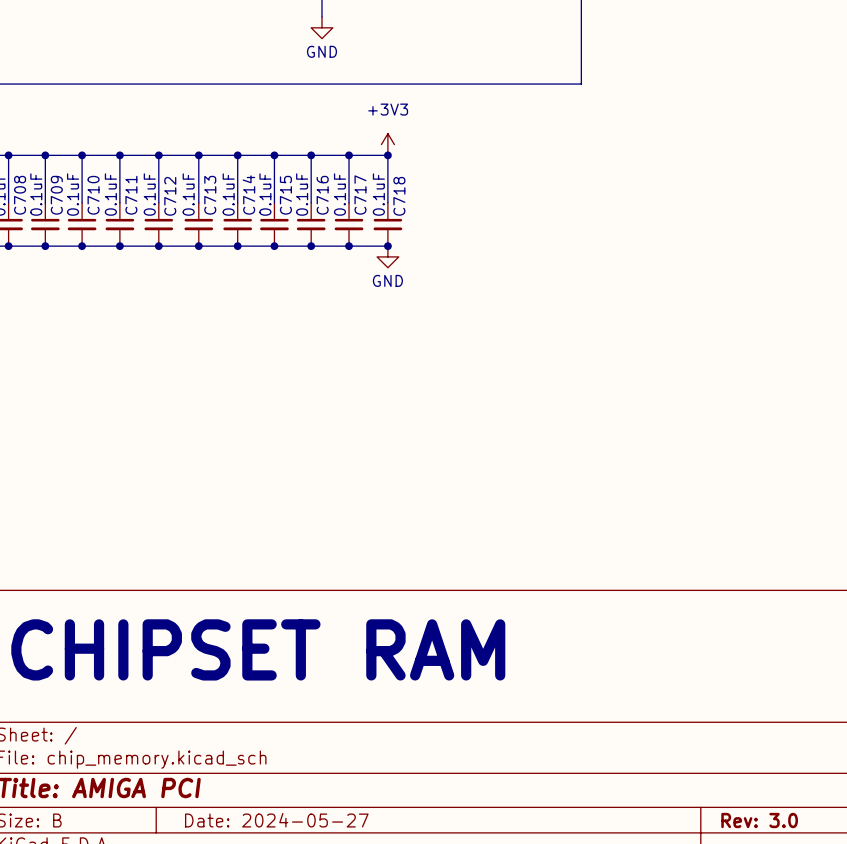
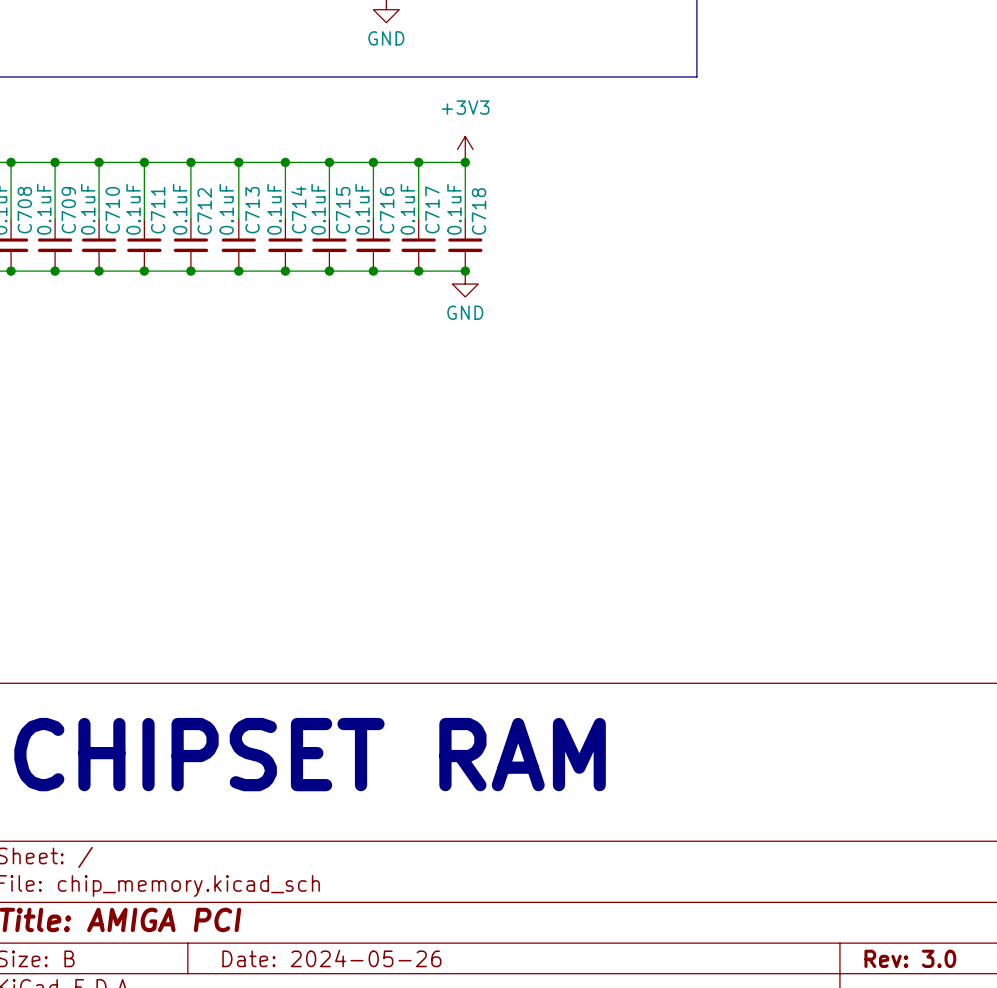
title block: Date: 2024-05-27 (276, 820) -> Date: 2024-05-26 (331, 958)

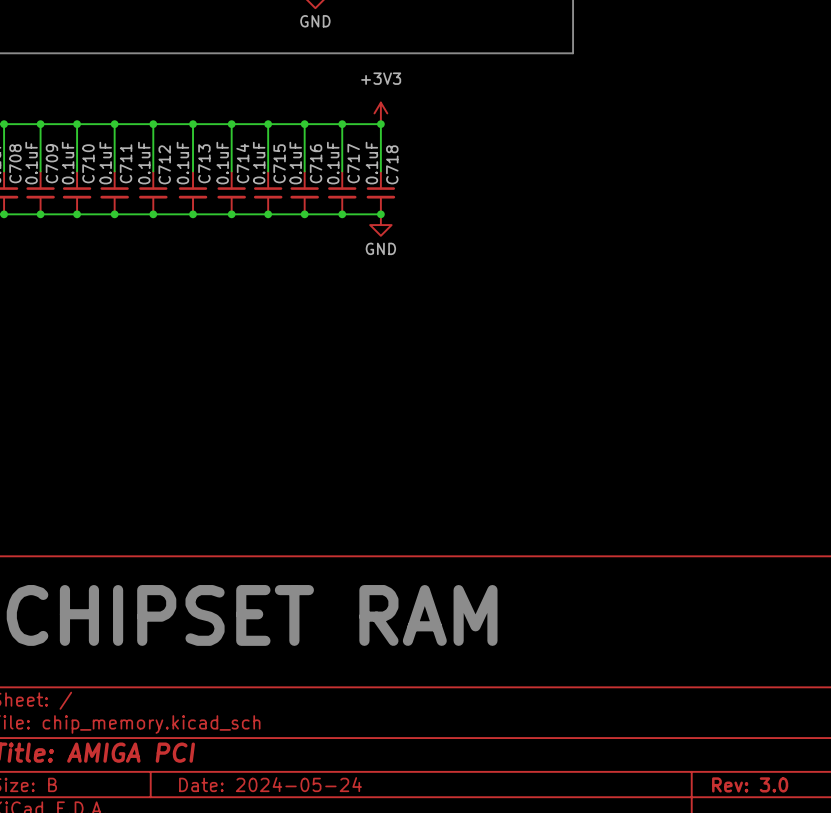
title block: Date: 2024-05-26 (331, 958) -> Date: 2024-05-24 (270, 784)

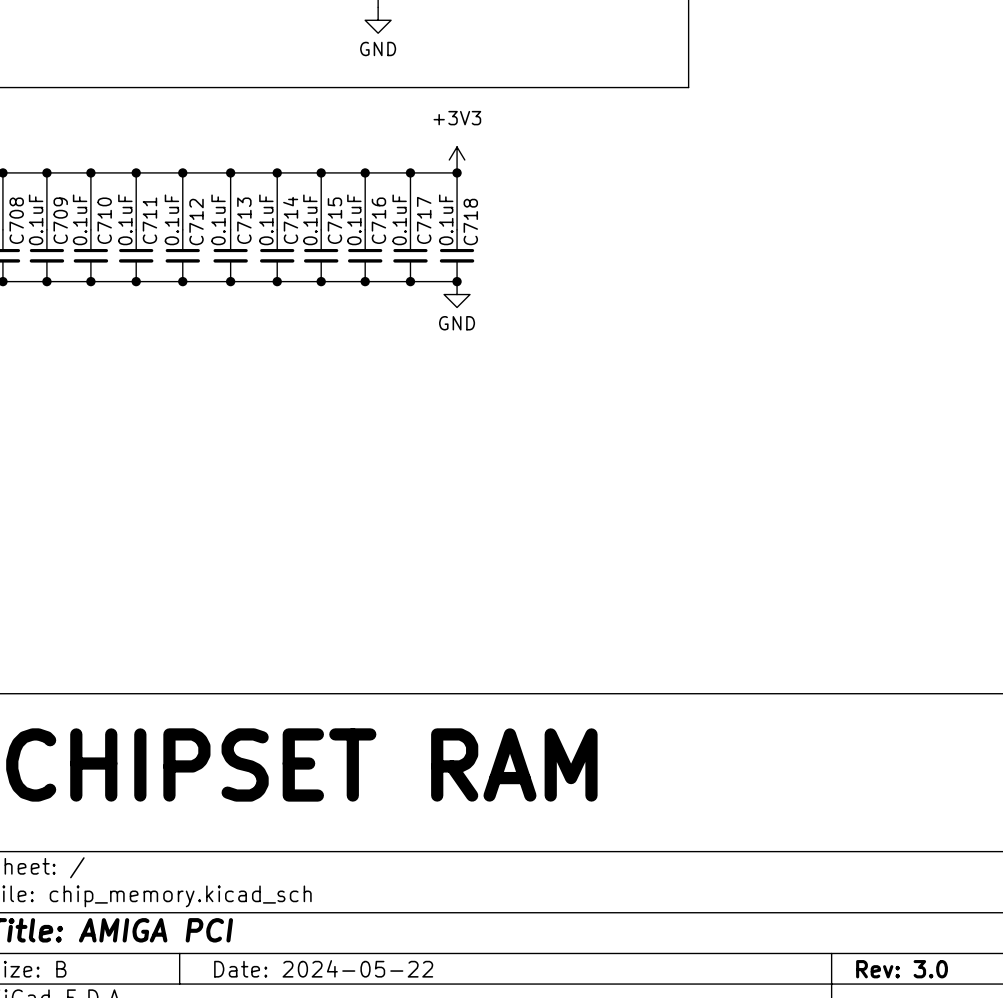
title block: Date: 2024-05-24 (270, 784) -> Date: 2024-05-22 (323, 968)

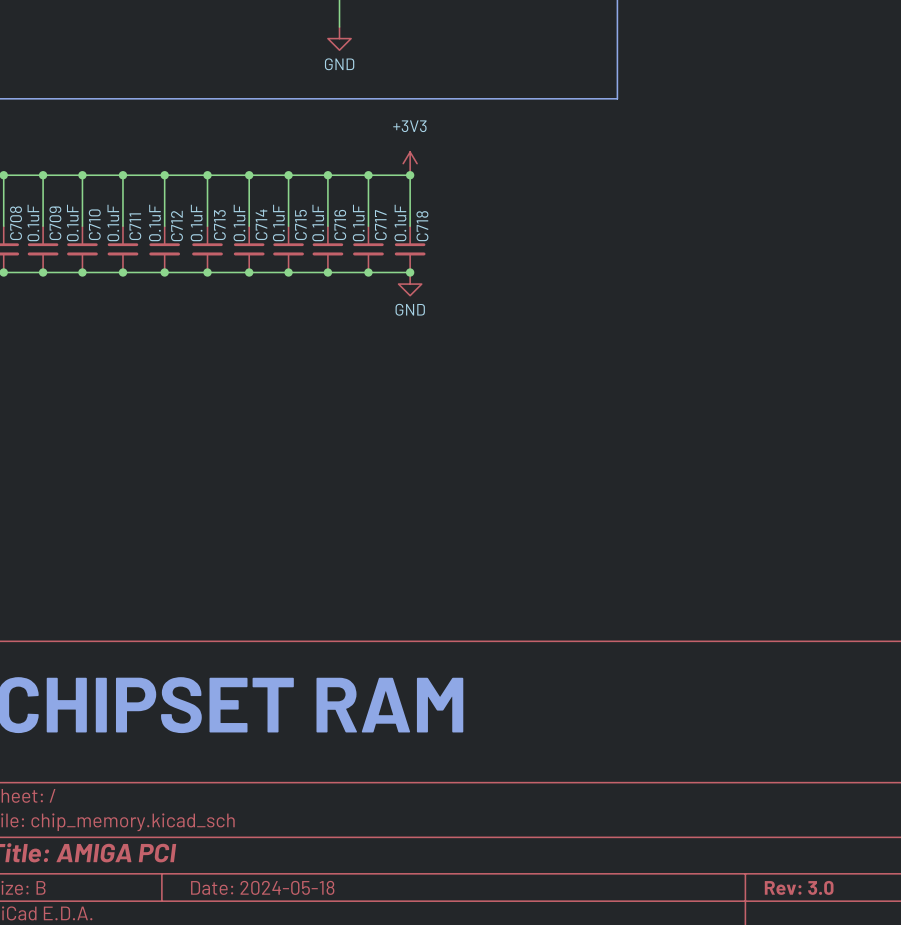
title block: Date: 2024-05-22 (323, 968) -> Date: 2024-05-18 (262, 887)

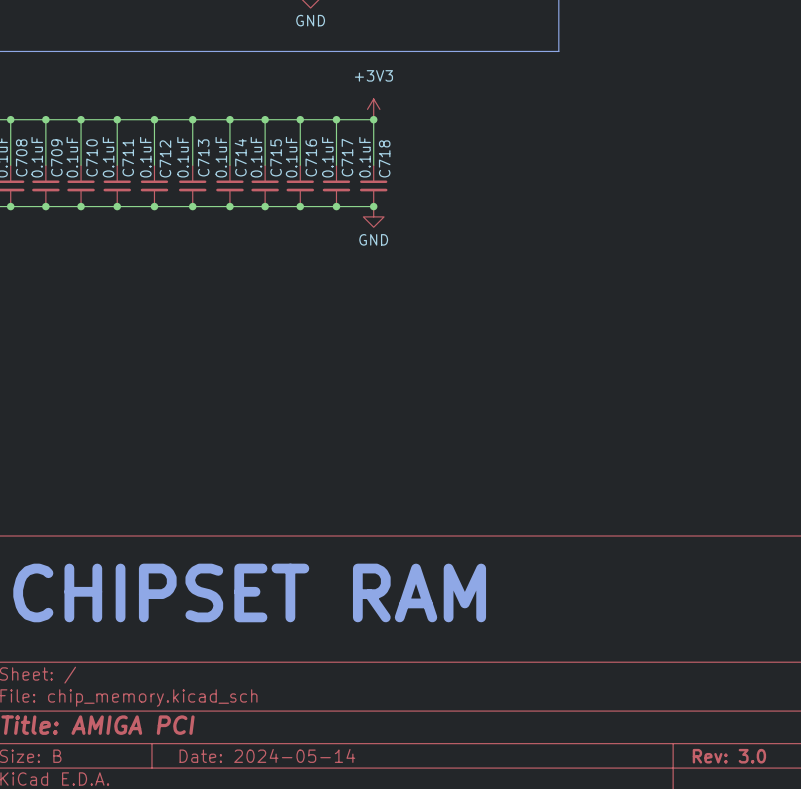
title block: Date: 2024-05-18 (262, 887) -> Date: 2024-05-14 (267, 755)

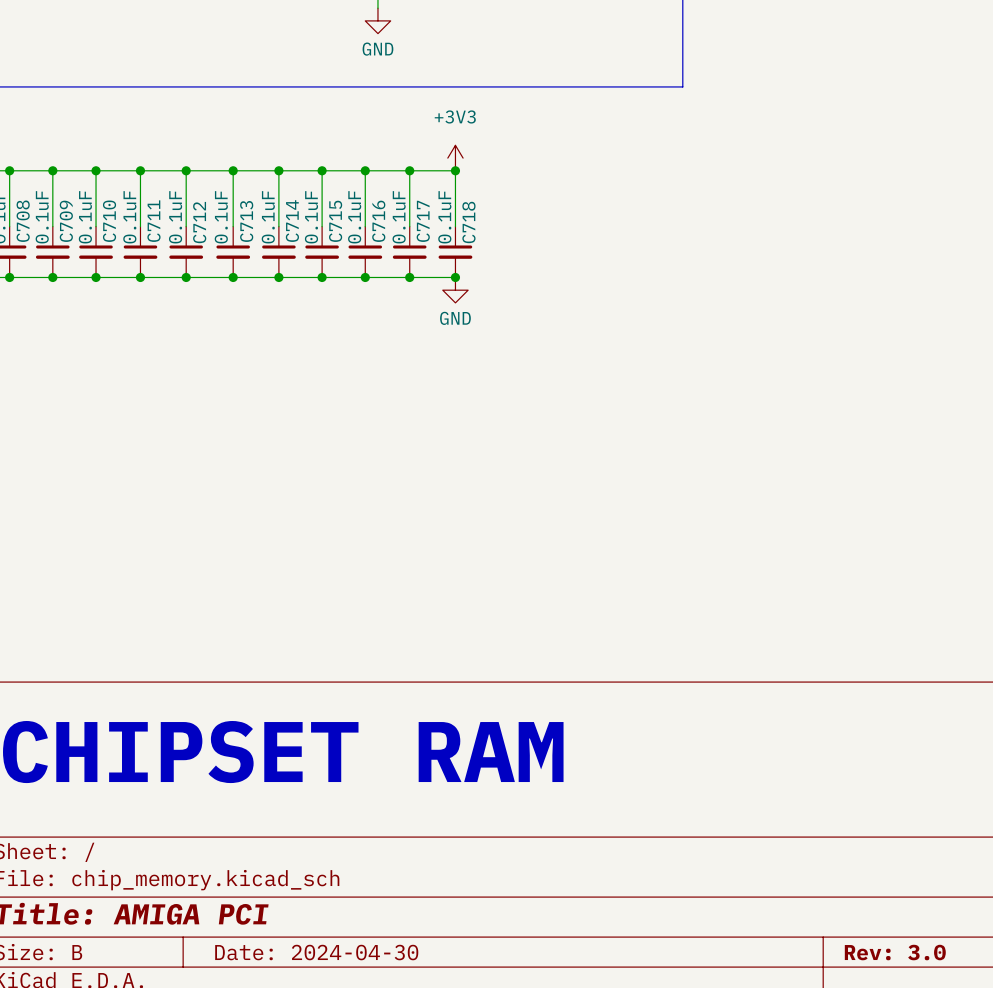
title block: Date: 2024-05-14 (267, 755) -> Date: 2024-04-30 (316, 952)

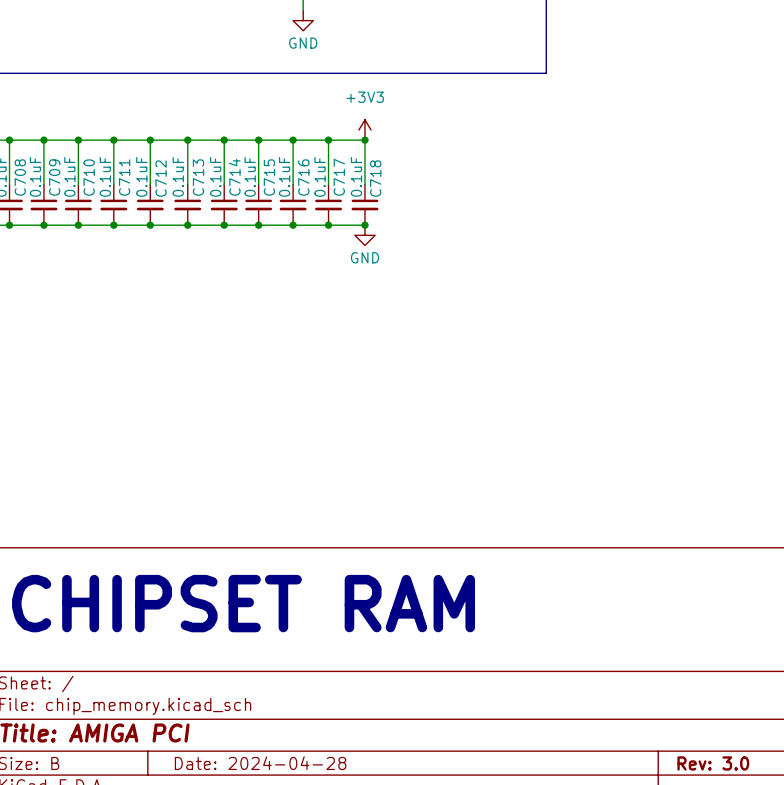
title block: Date: 2024-04-30 (316, 952) -> Date: 2024-04-28 (260, 763)

